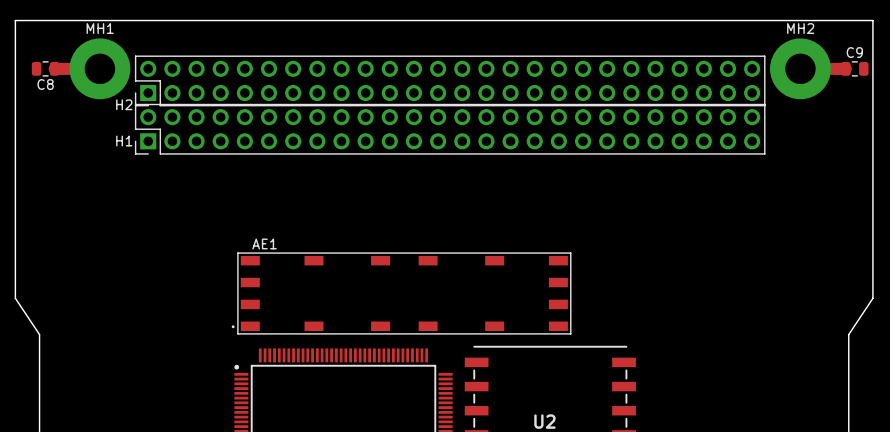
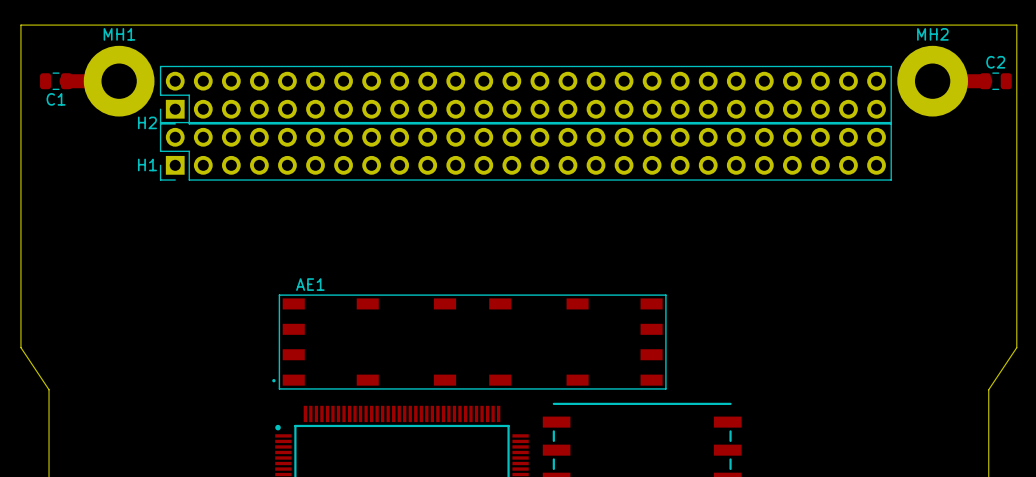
C9 name: C9 (854, 52) -> C2 (995, 62)
C8 name: C8 (45, 84) -> C1 (56, 99)

